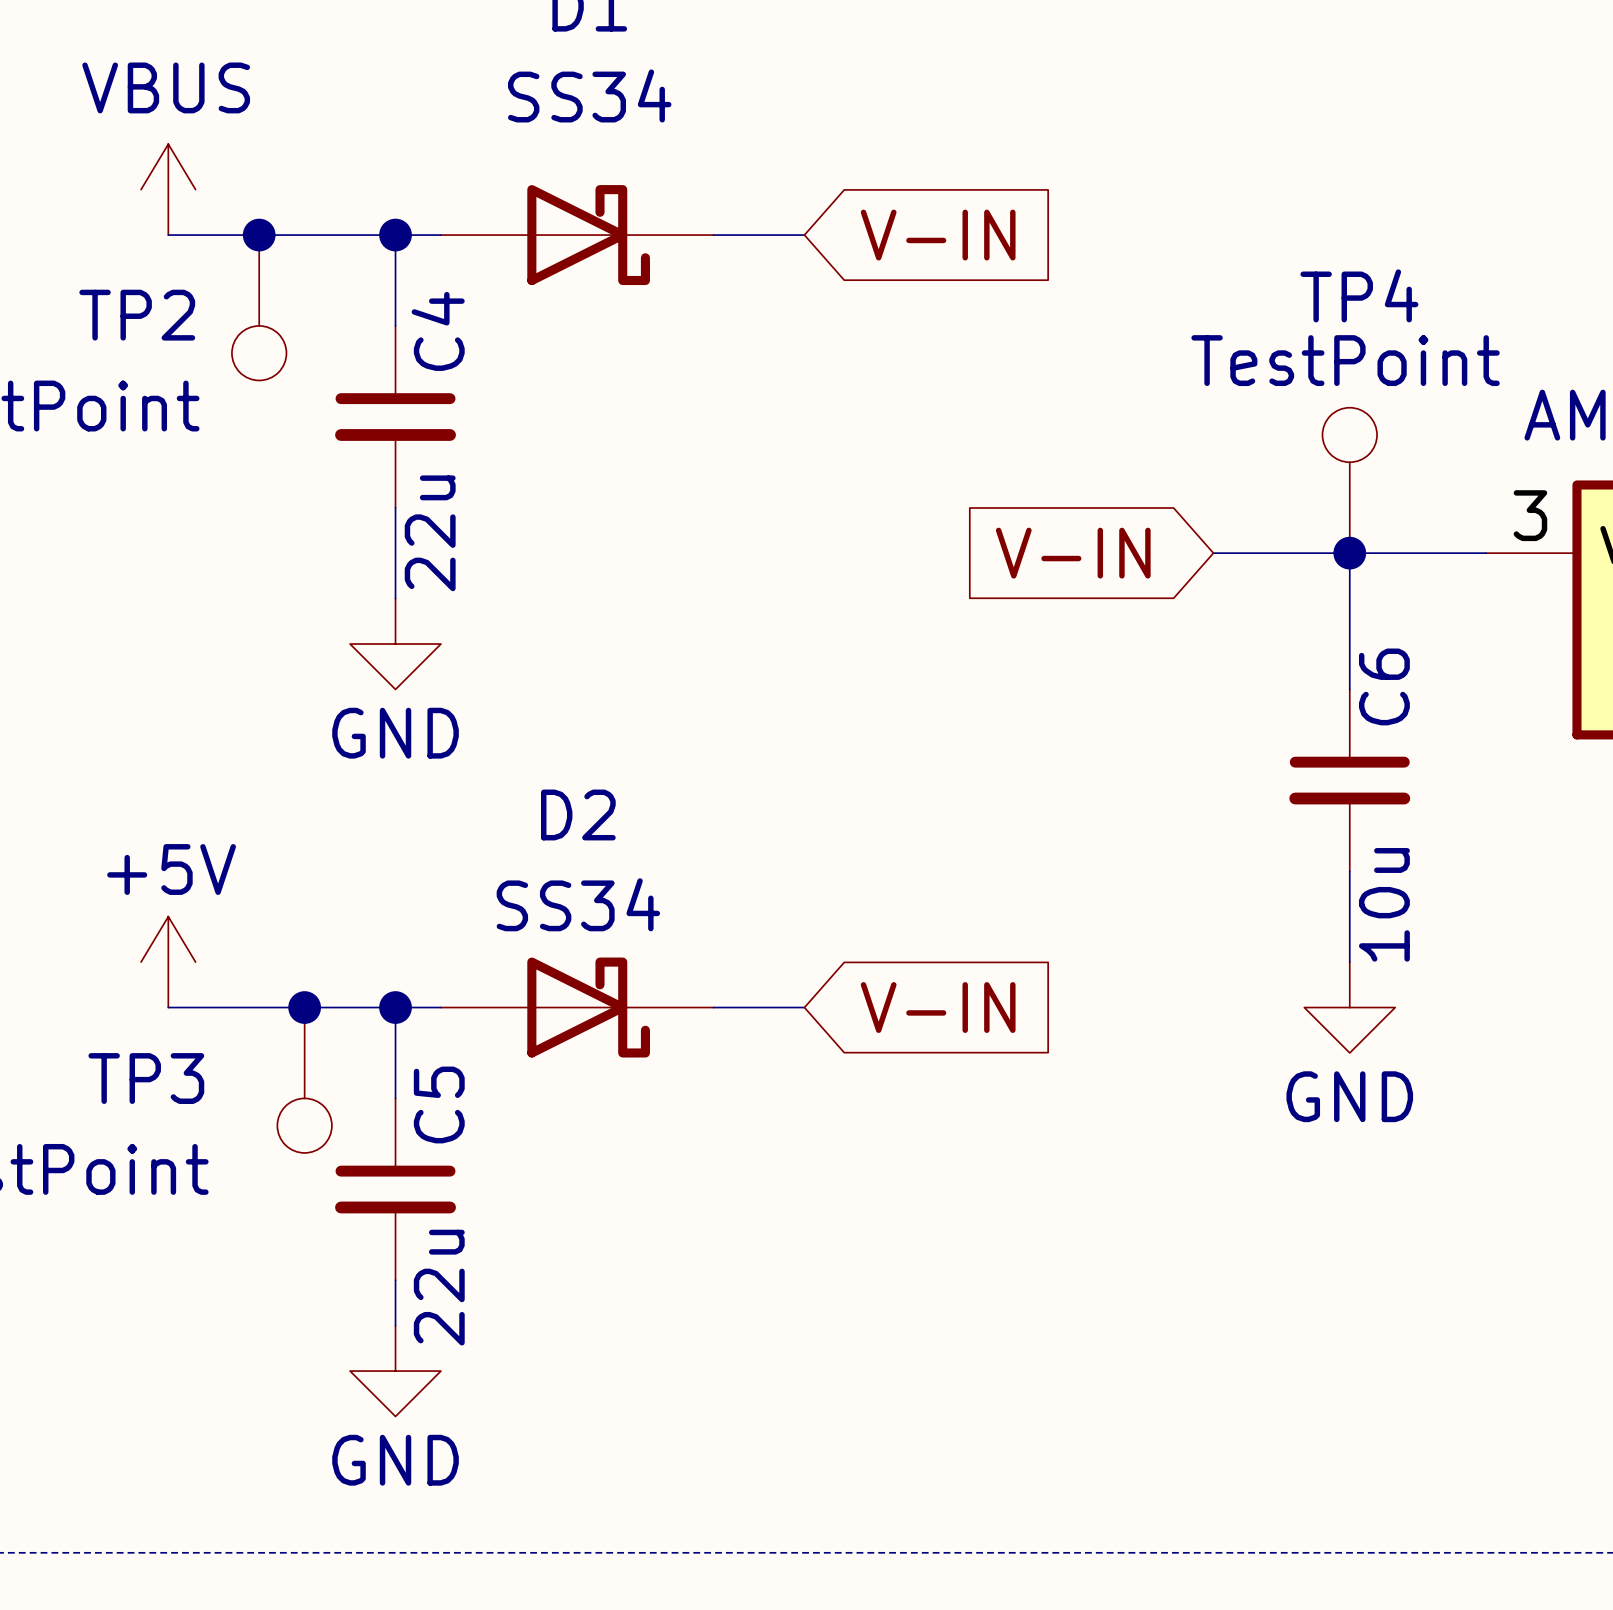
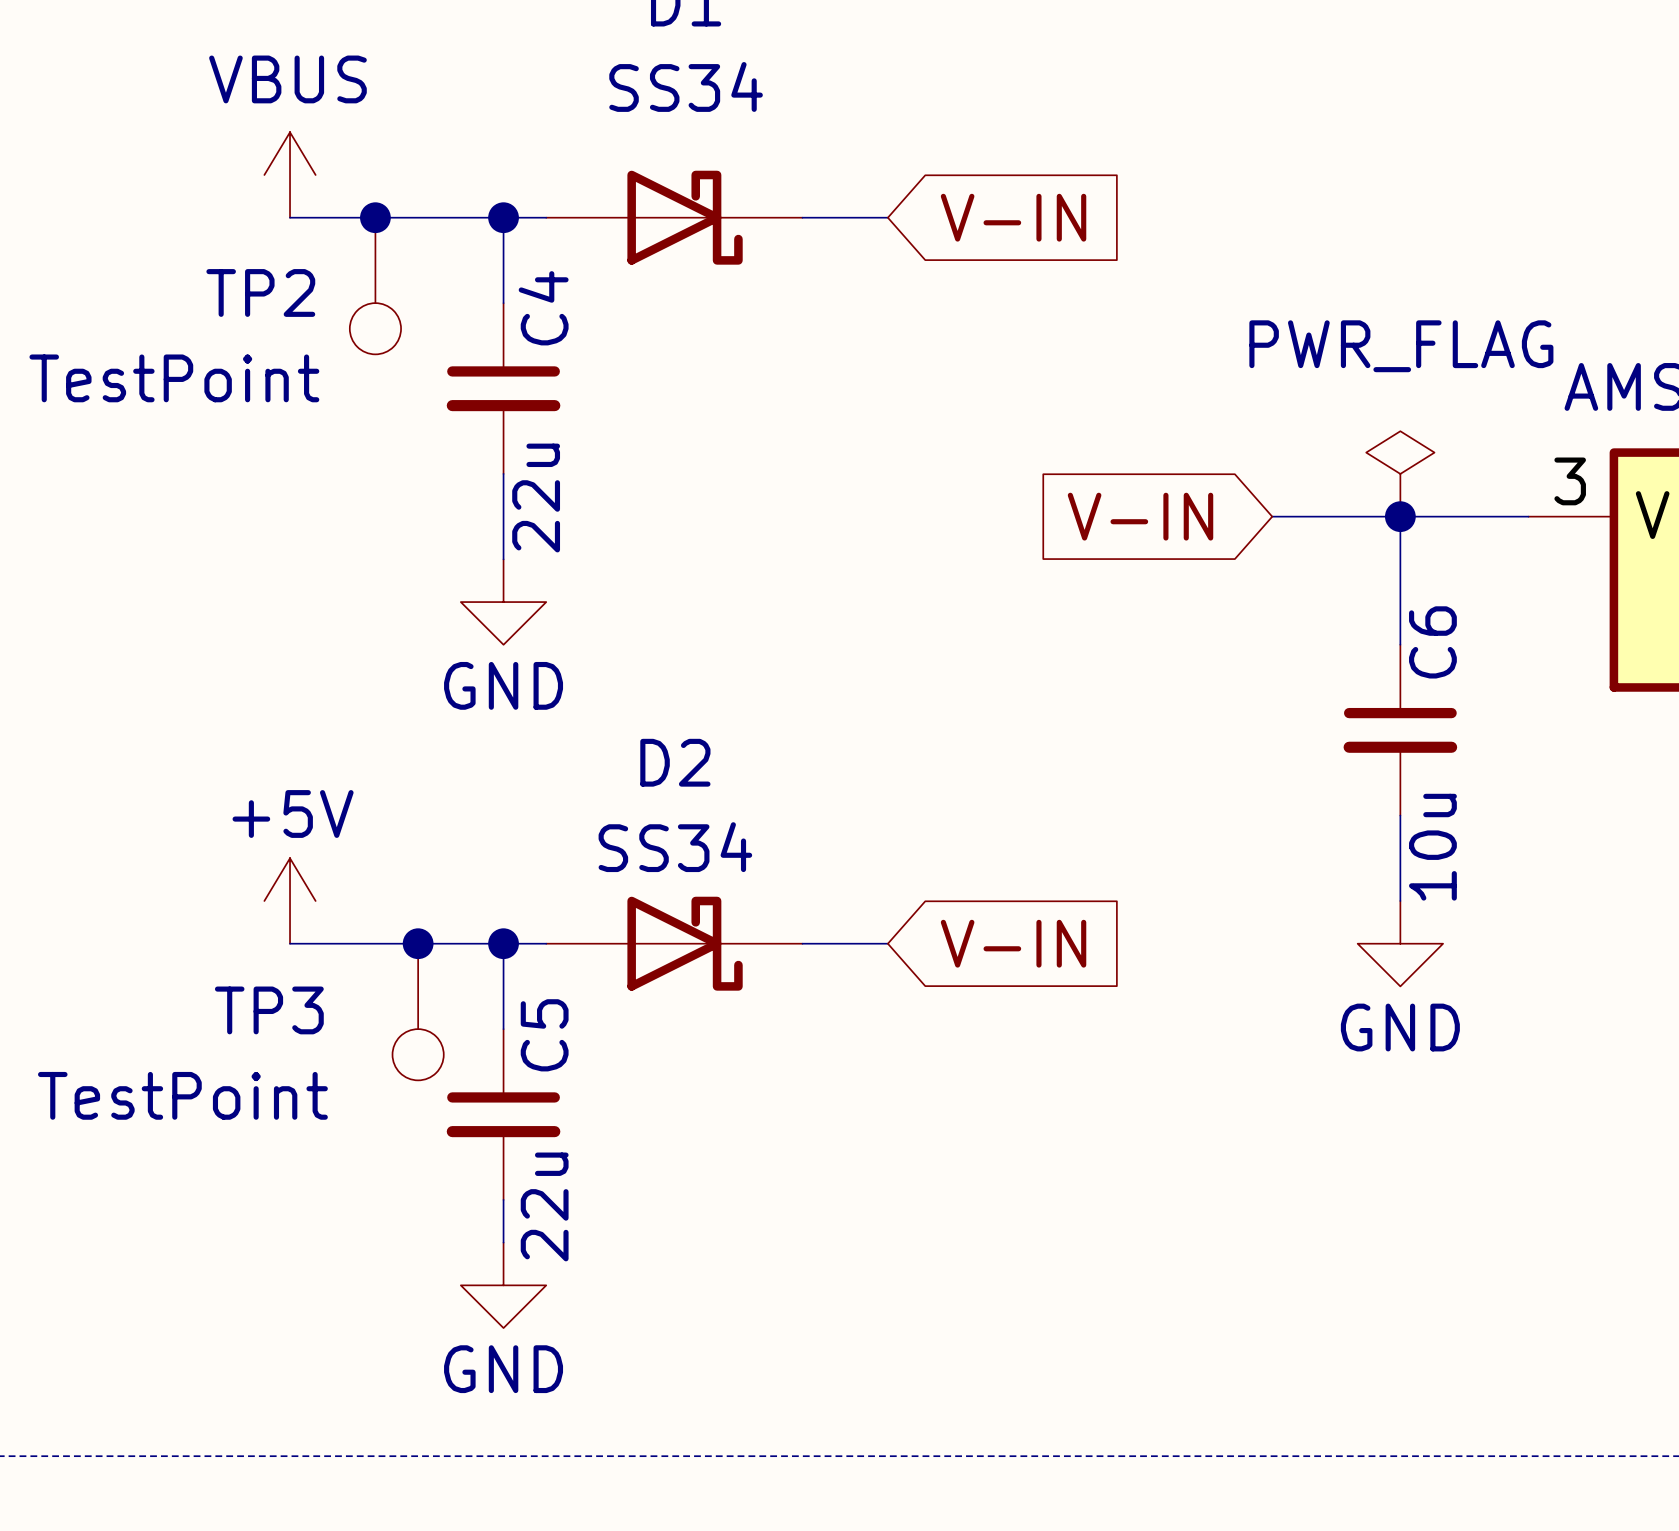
TP4: TestPoint (1349, 480) -> none
power symbol: none -> PWR_FLAG (1400, 473)

